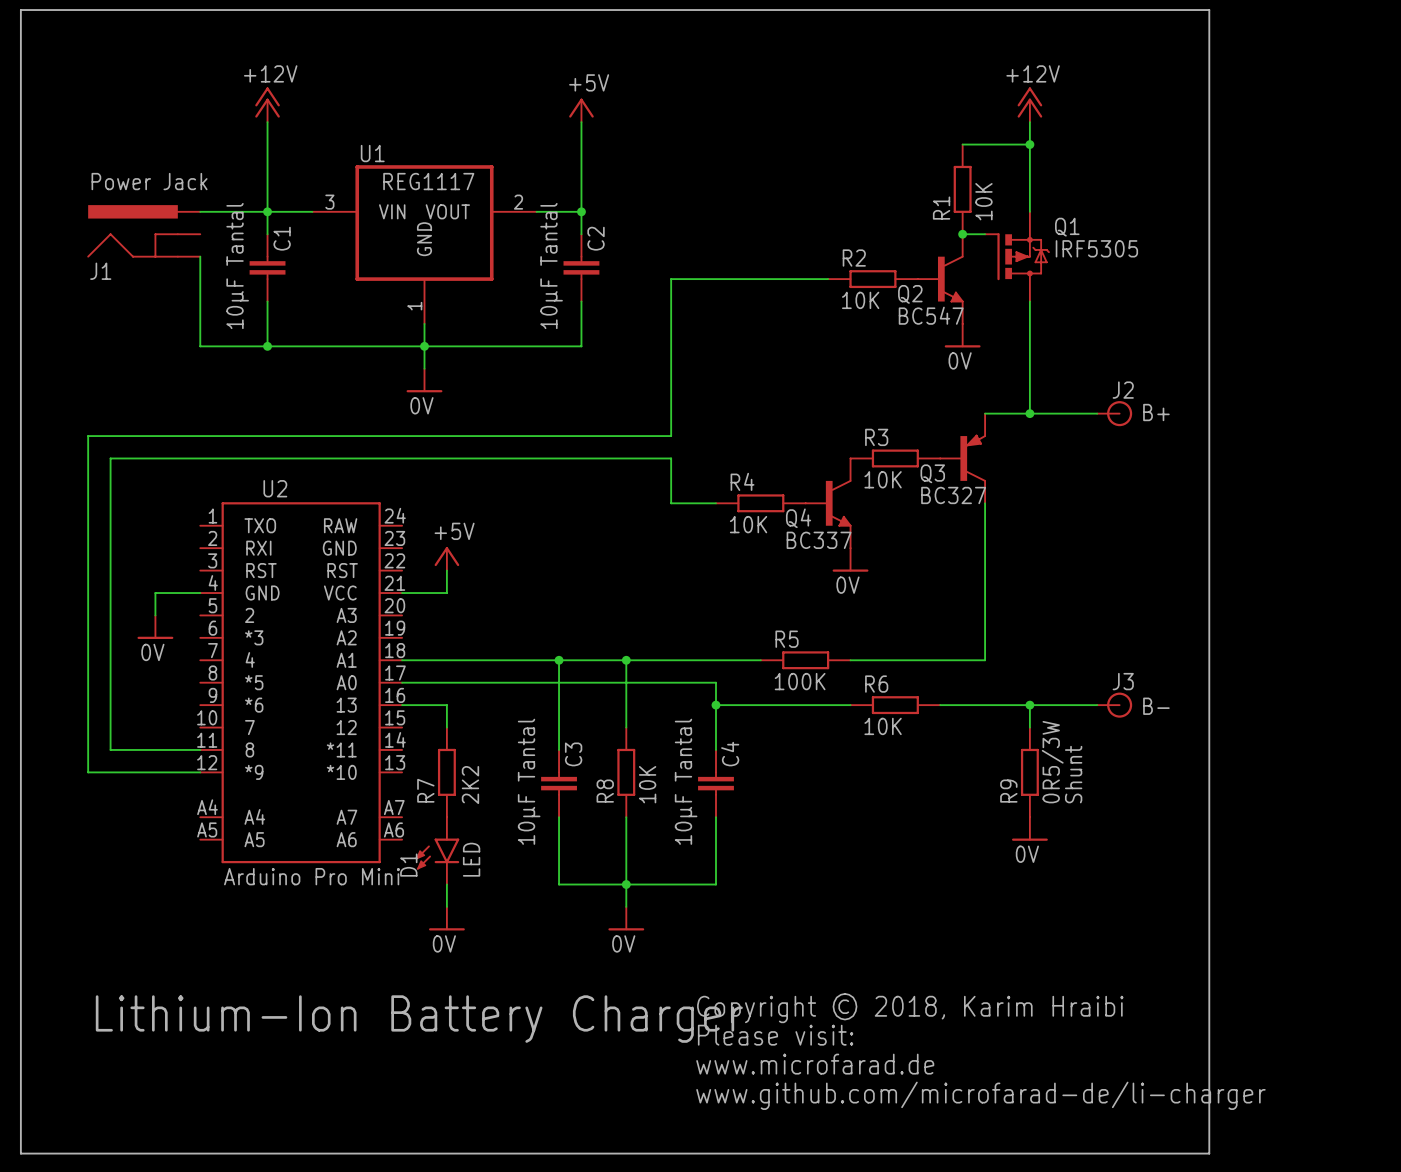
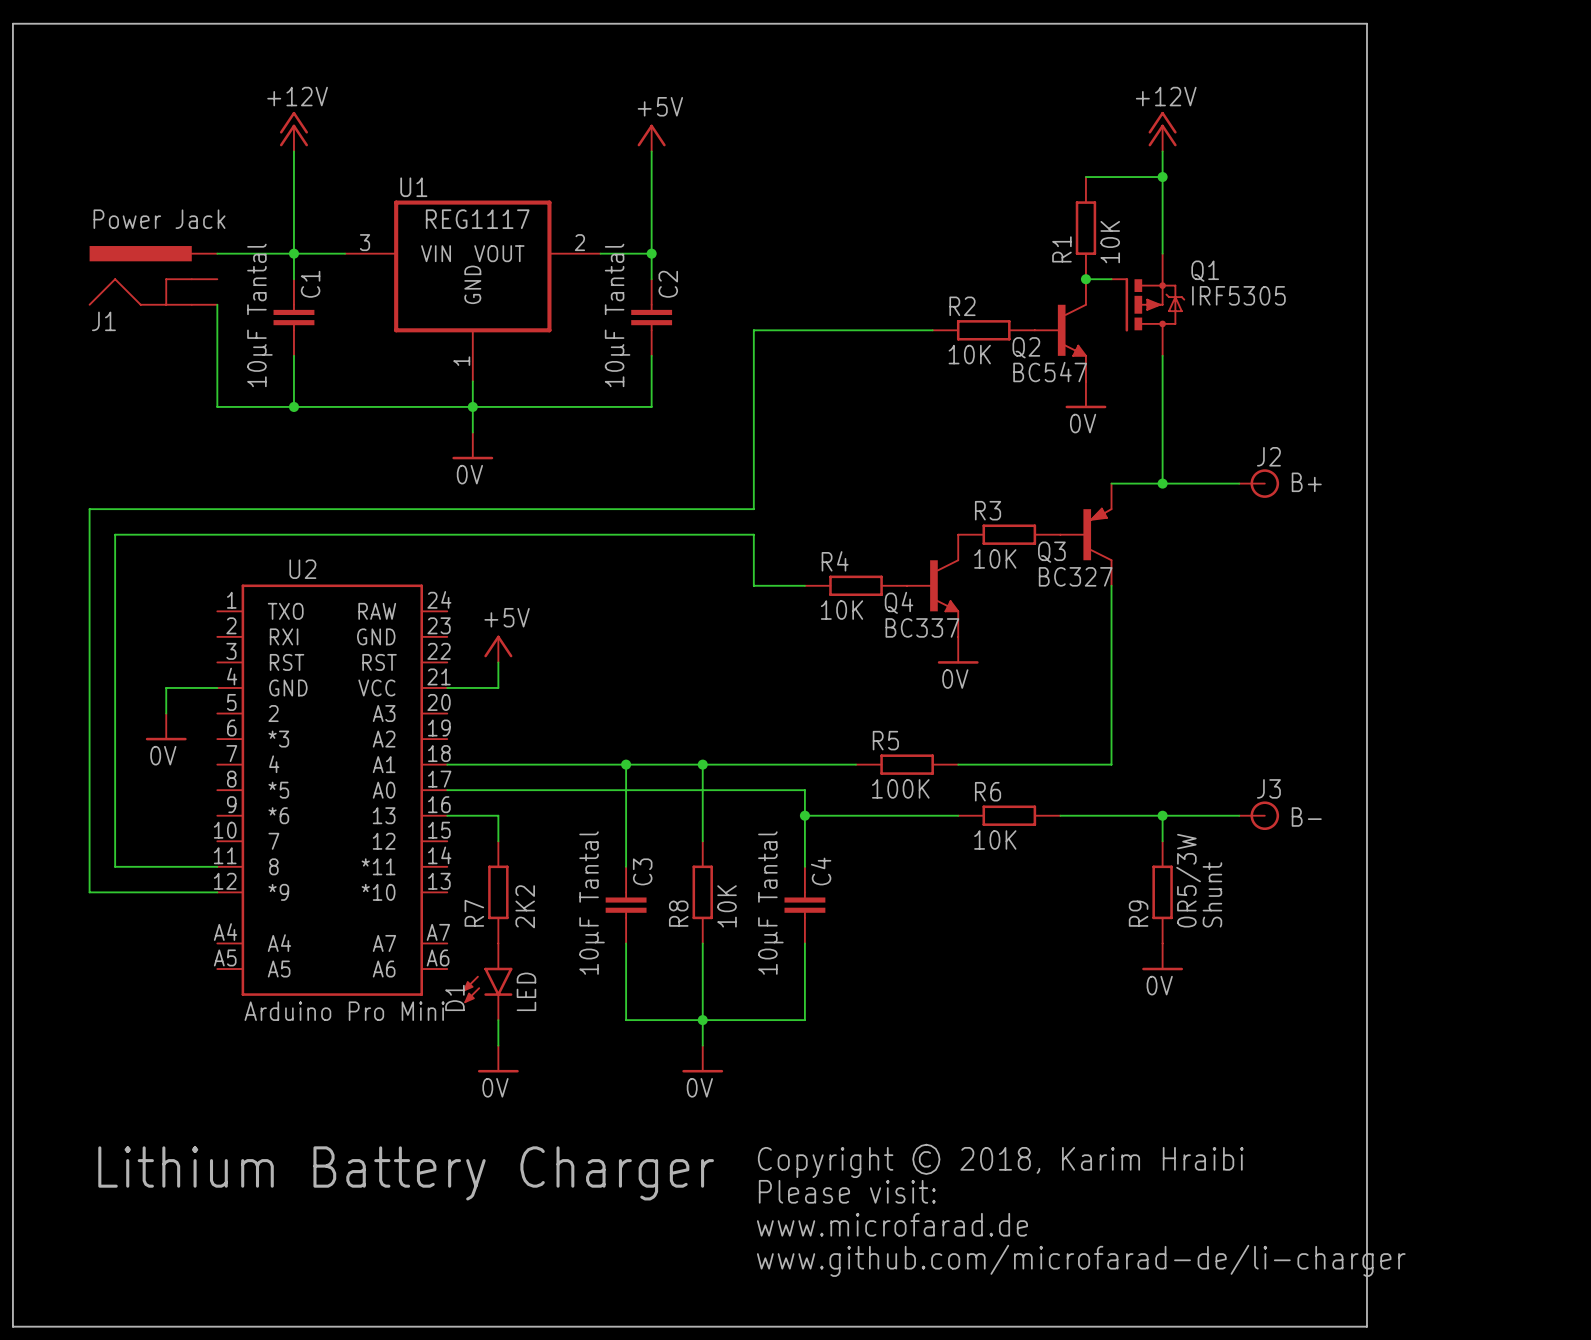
text position: Copyright © 2018, Karim Hraibi (910, 1008) -> Copyright © 2018, Karim Hraibi (1000, 1160)
text: Lithium-Ion Battery Charger (419, 1019) -> Lithium Battery Charger (406, 1173)
text position: Please visit: (775, 1035) -> Please visit: (847, 1191)
text position: www.microfarad.de (815, 1064) -> www.microfarad.de (892, 1224)
text position: www.github.com/microfarad-de/li-charger (980, 1095) -> www.github.com/microfarad-de/li-charger (1081, 1260)

